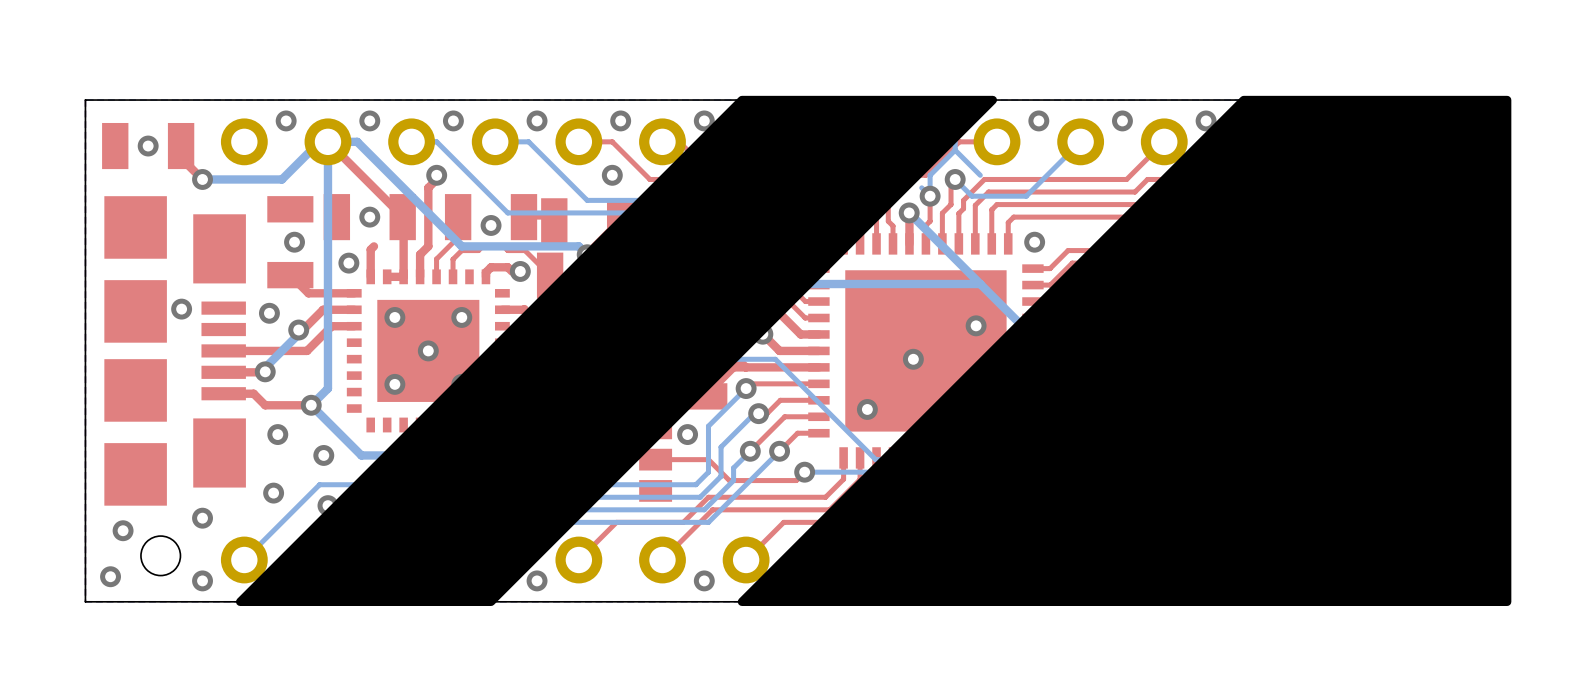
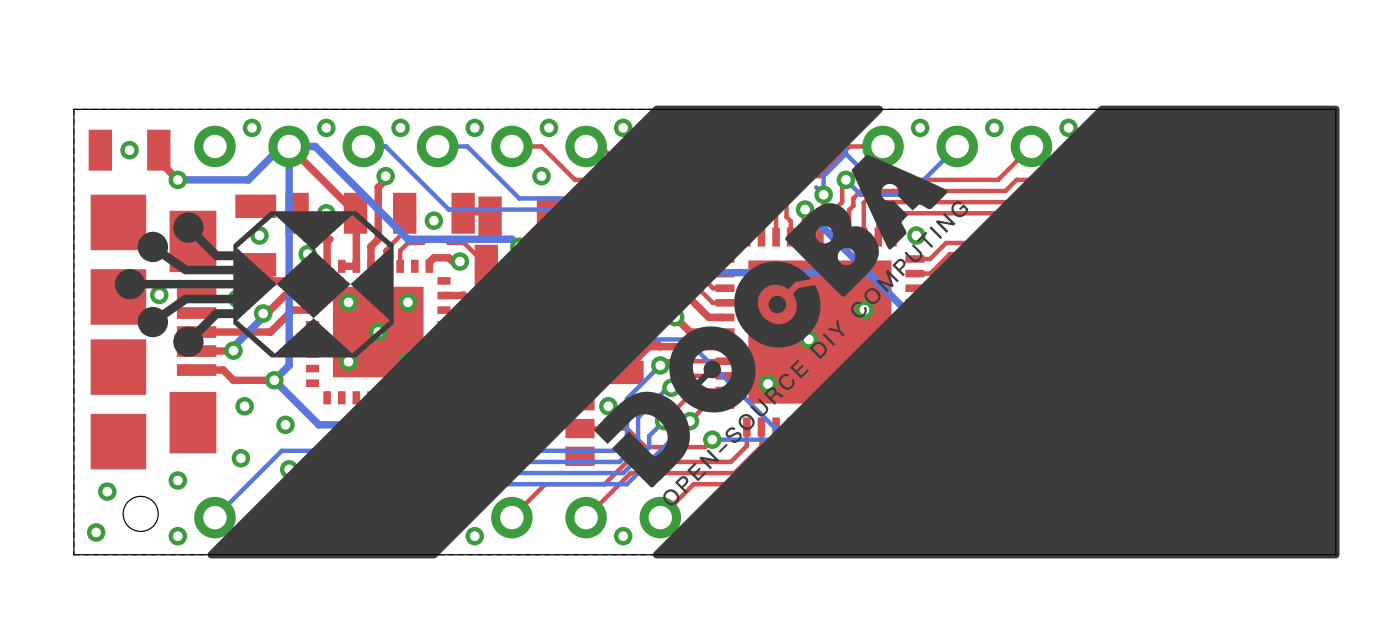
drawing: none -> [594, 155, 969, 506]
drawing: none -> [114, 211, 394, 358]

